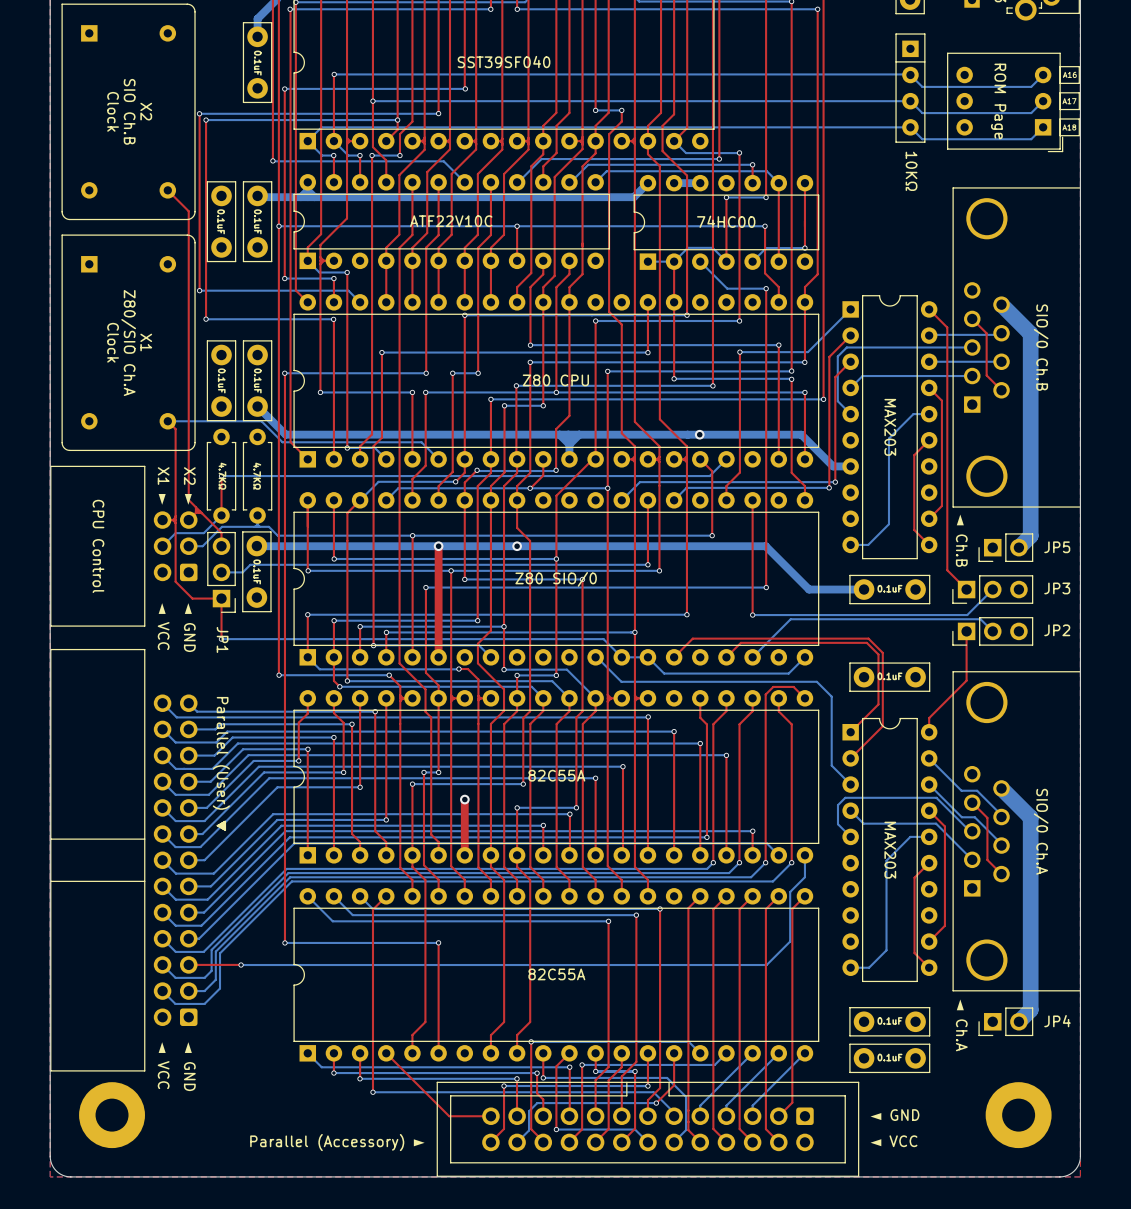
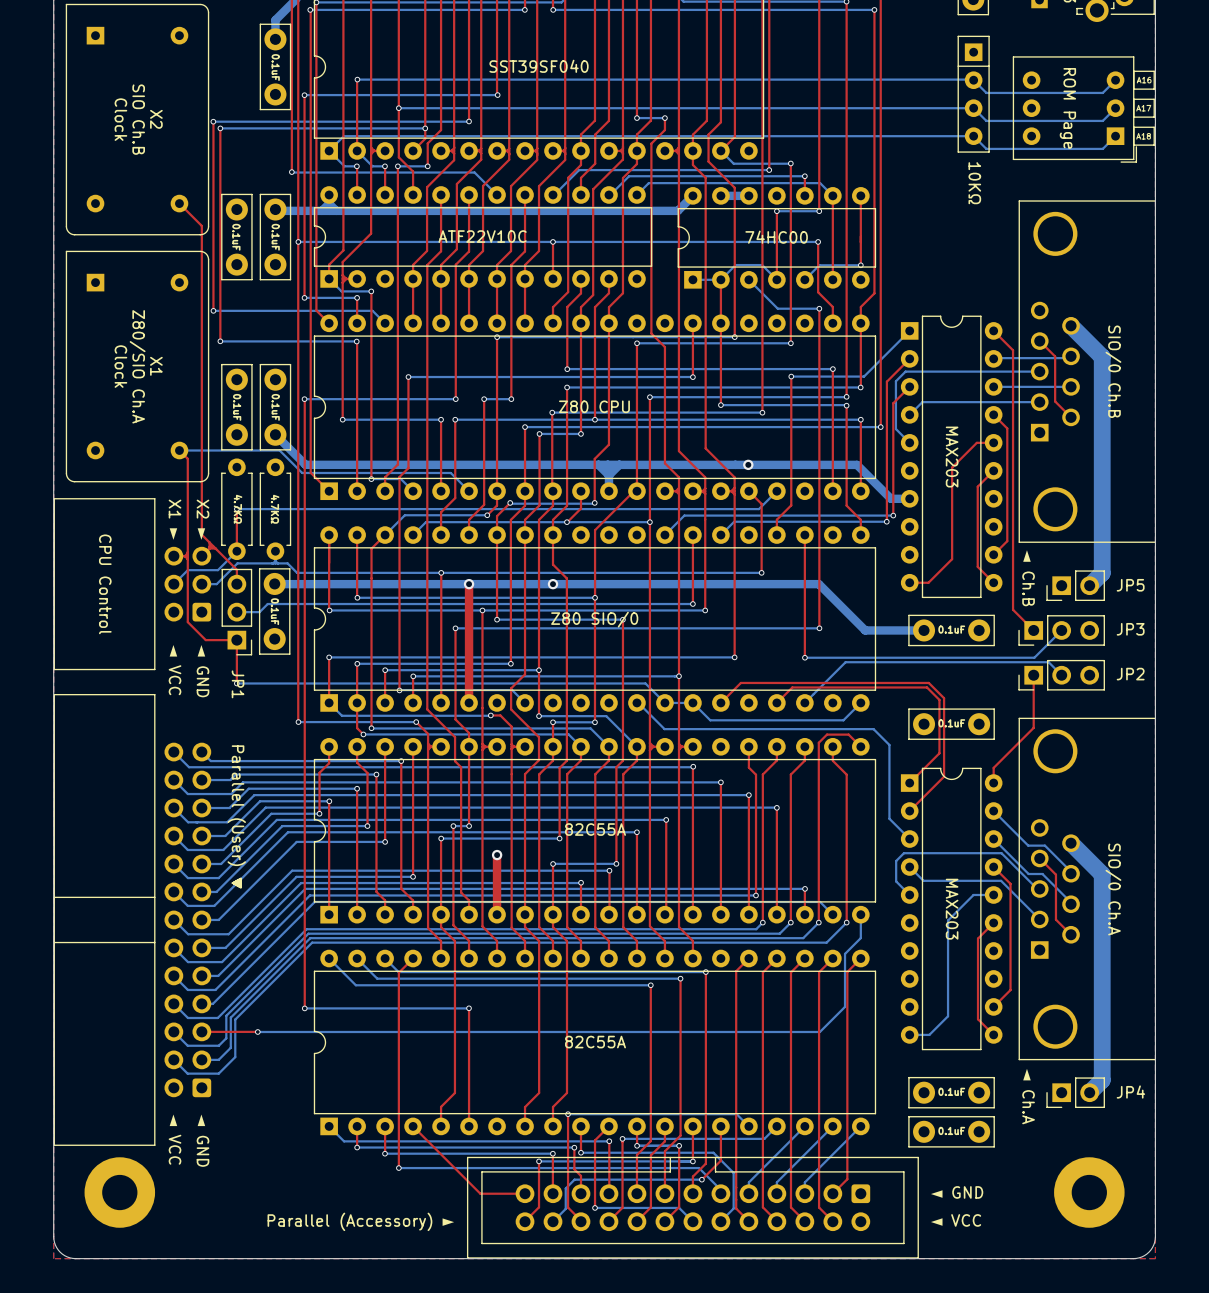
bottom track: (929, 414) (913, 414) (888, 438) (888, 524) (868, 544) (850, 544) -> none
top track: none -> (993, 442) (976, 442) (952, 467) (952, 559) (928, 582) (909, 582)

